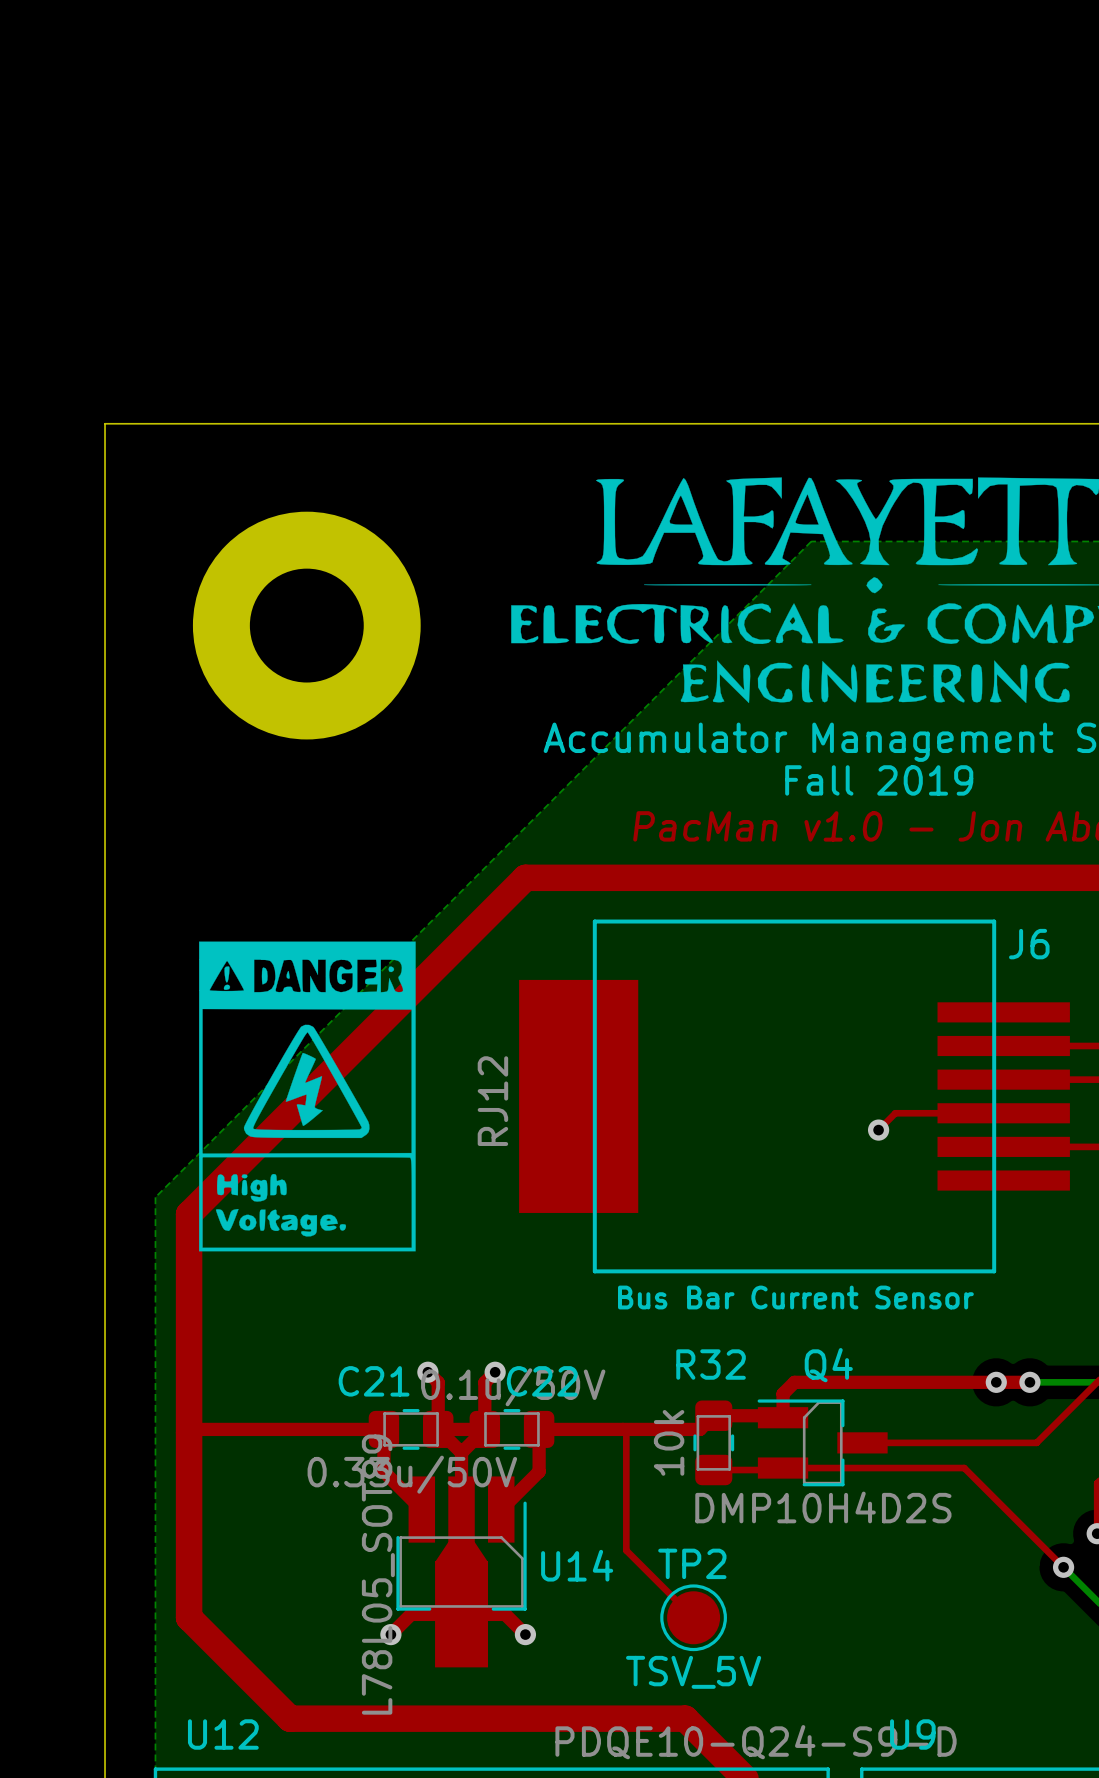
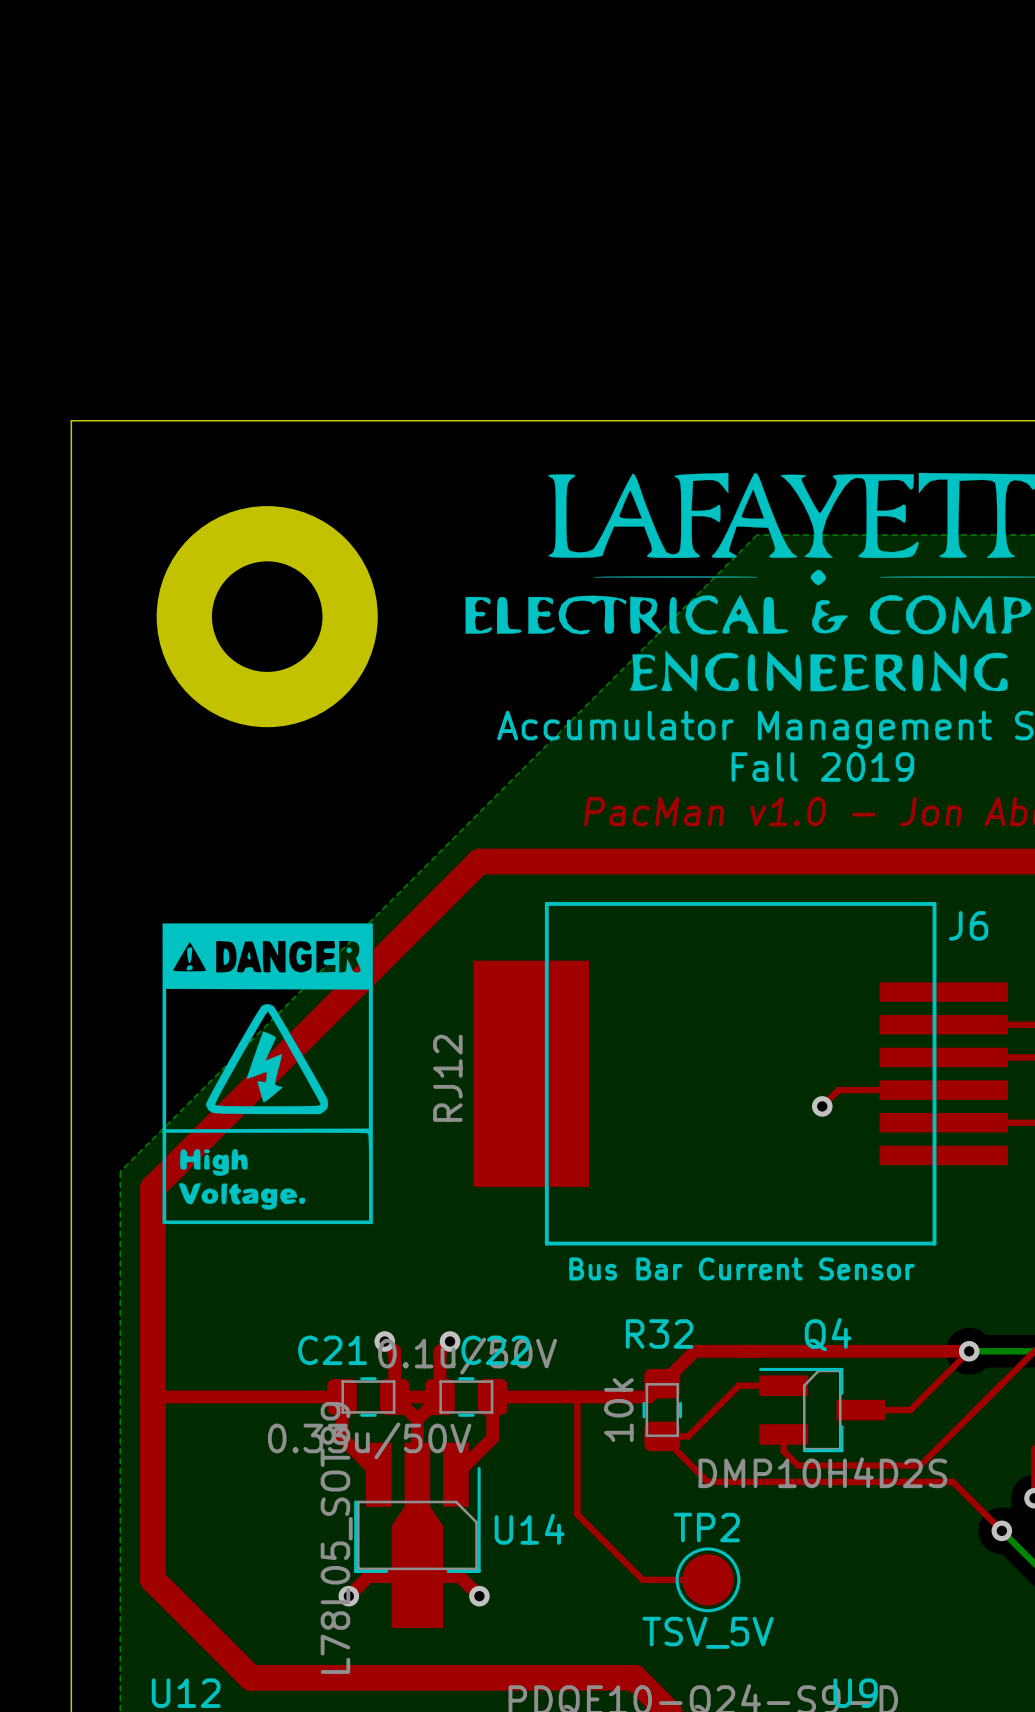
top track: (794, 1382) (783, 1393) (783, 1417) (781, 1415) (713, 1415) -> (740, 1351) (694, 1351) (662, 1383)
via: (996, 1382) -> none
top track: none -> (783, 1385) (738, 1385) (688, 1436)
Q4 position: (822, 1442) -> (822, 1410)
top track: (862, 1442) (918, 1442) -> none
top track: (969, 1442) (1036, 1442) -> (910, 1410) (969, 1351)
top track: none -> (975, 1410) (920, 1465) (798, 1465) (783, 1451) (783, 1434)
top track: (740, 1470) (781, 1470) (783, 1468) (964, 1468) (1013, 1516) -> (662, 1436) (707, 1481) (952, 1481)
top track: none -> (642, 1579) (708, 1579)
TP2 position: (693, 1617) -> (708, 1579)

